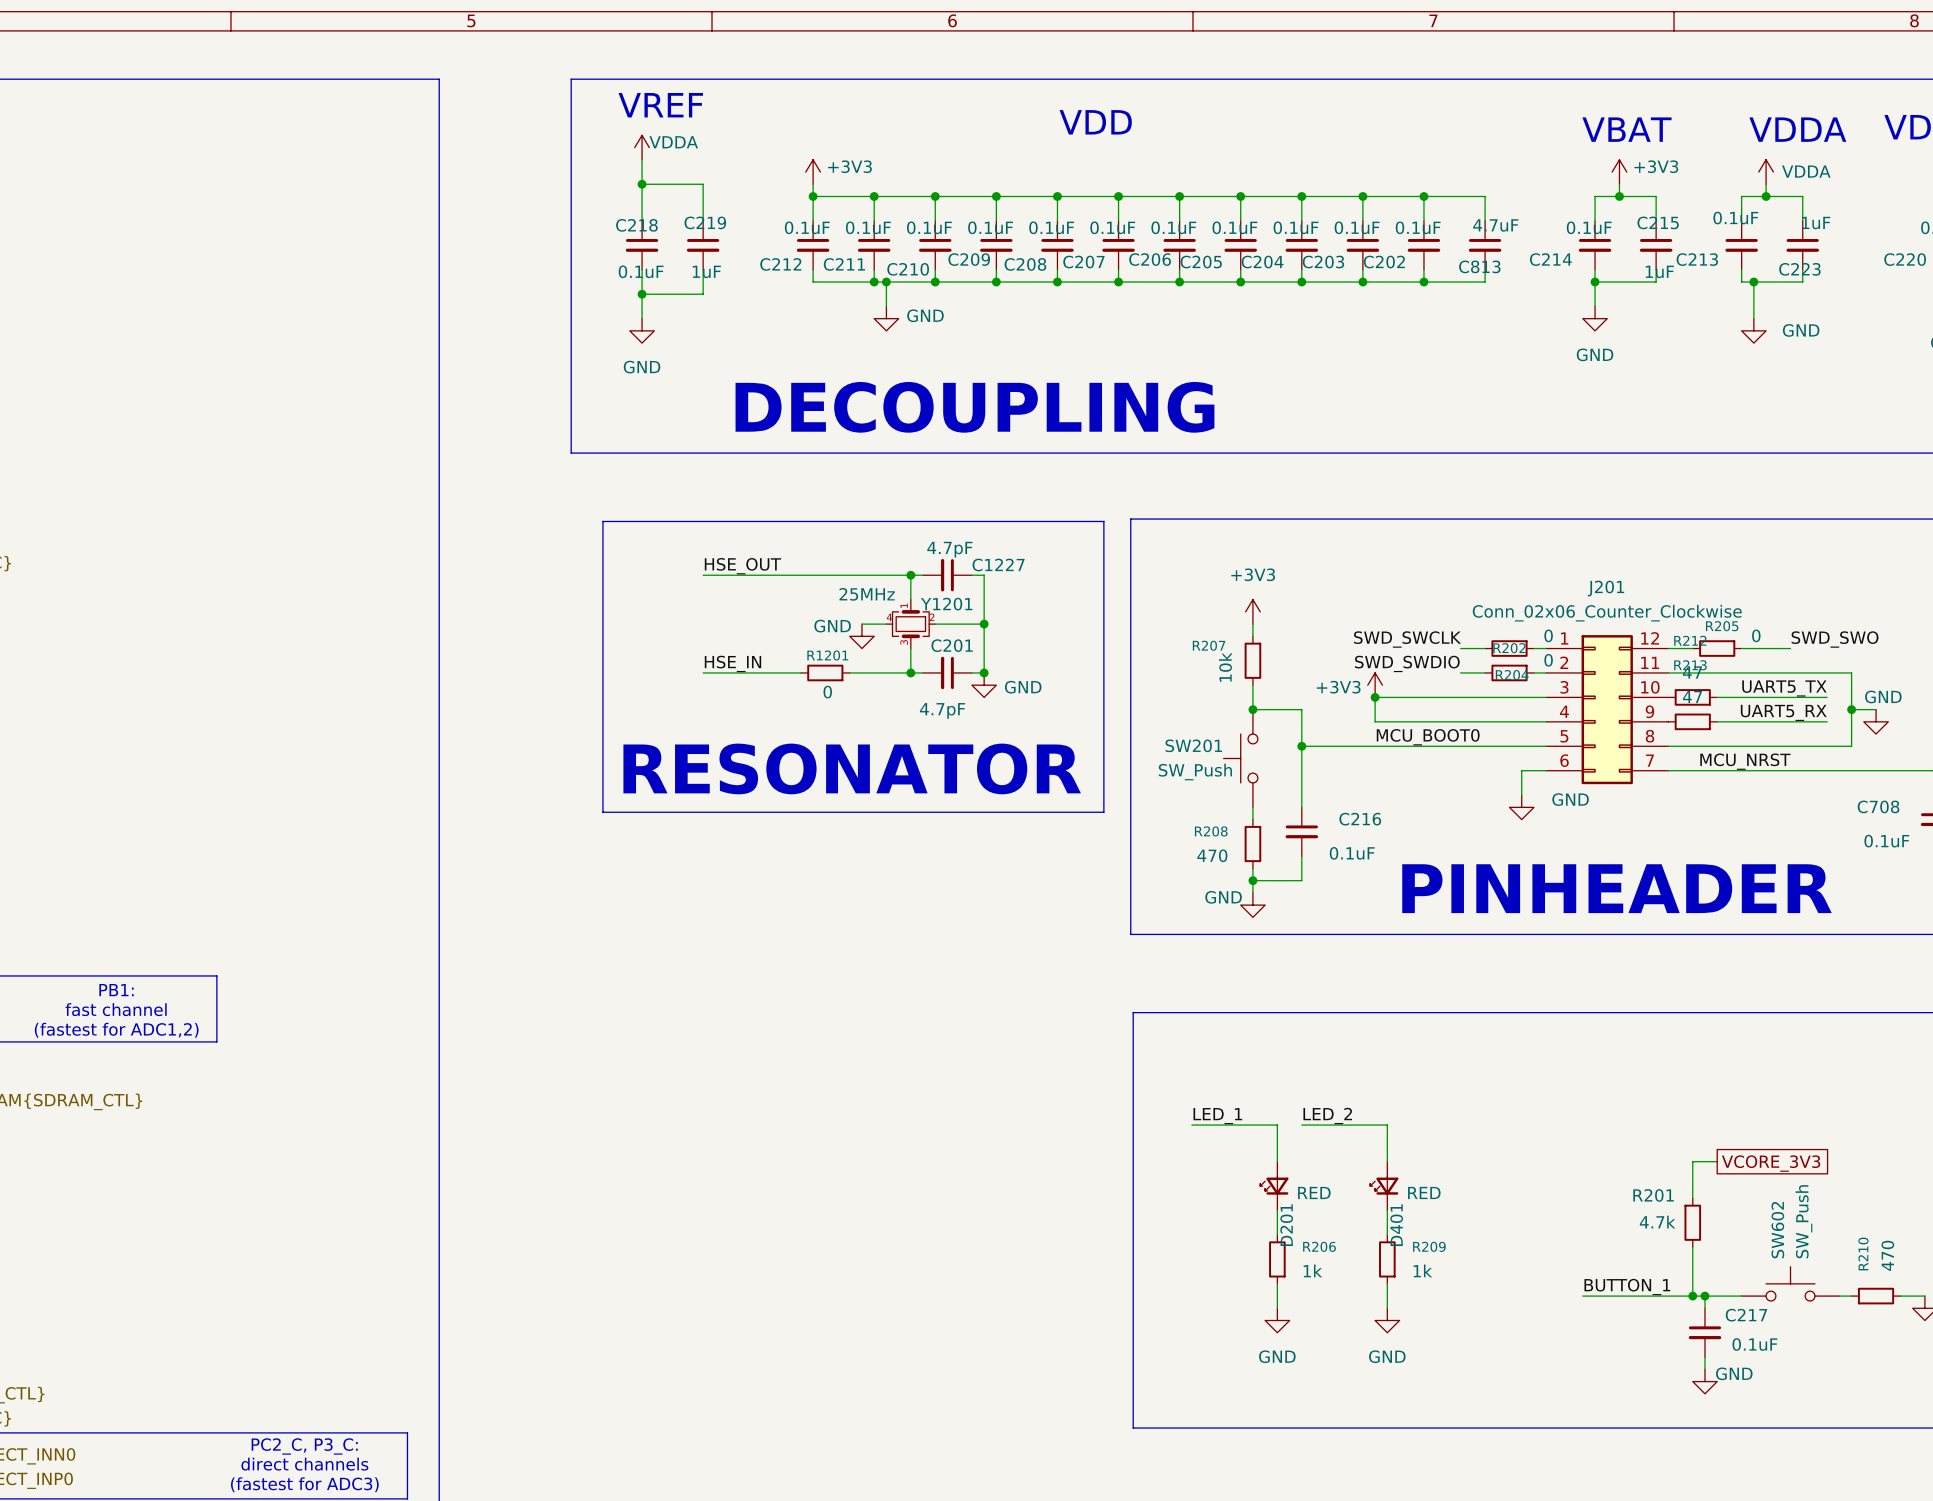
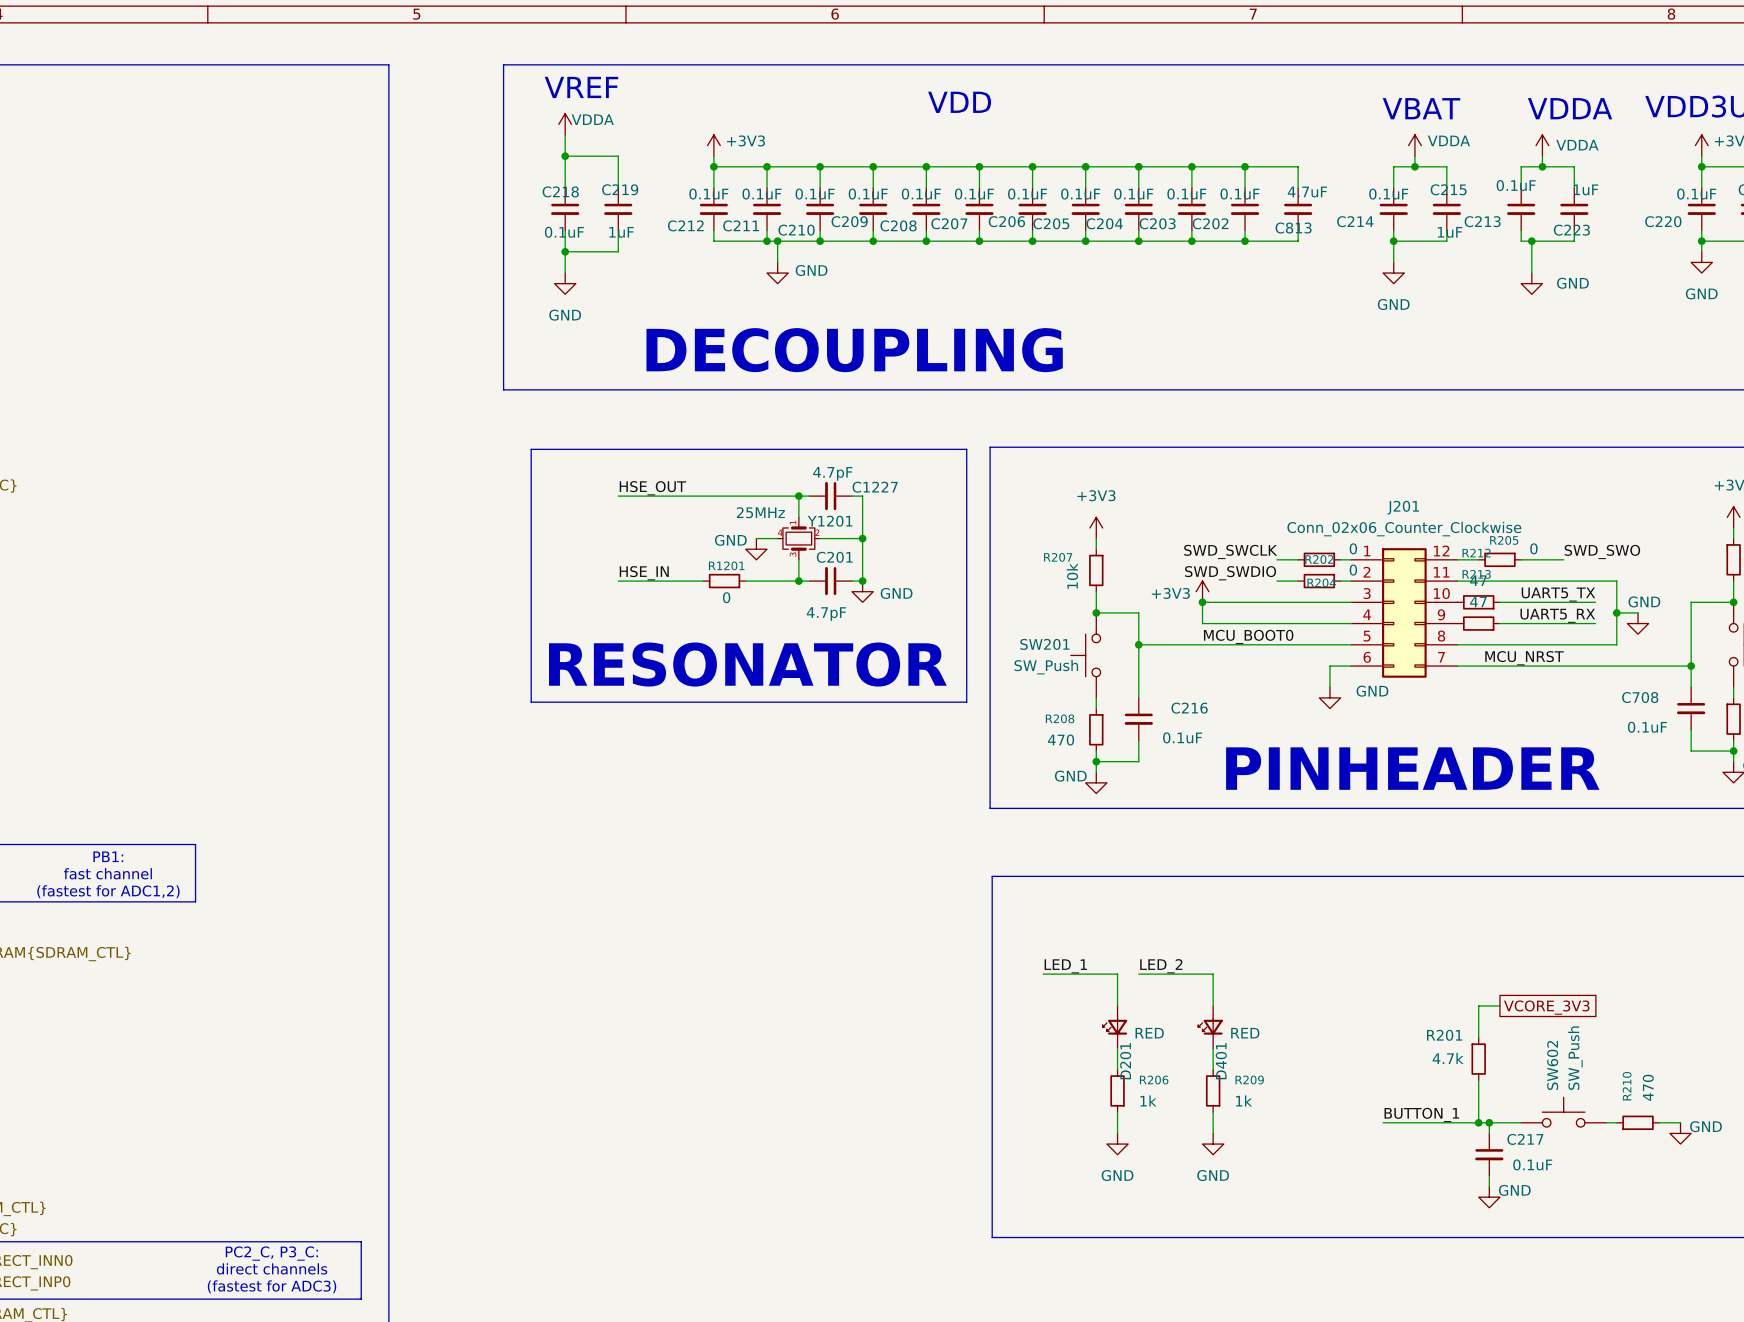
power symbol: +3V3 (1619, 172) -> VDDA (1414, 145)

